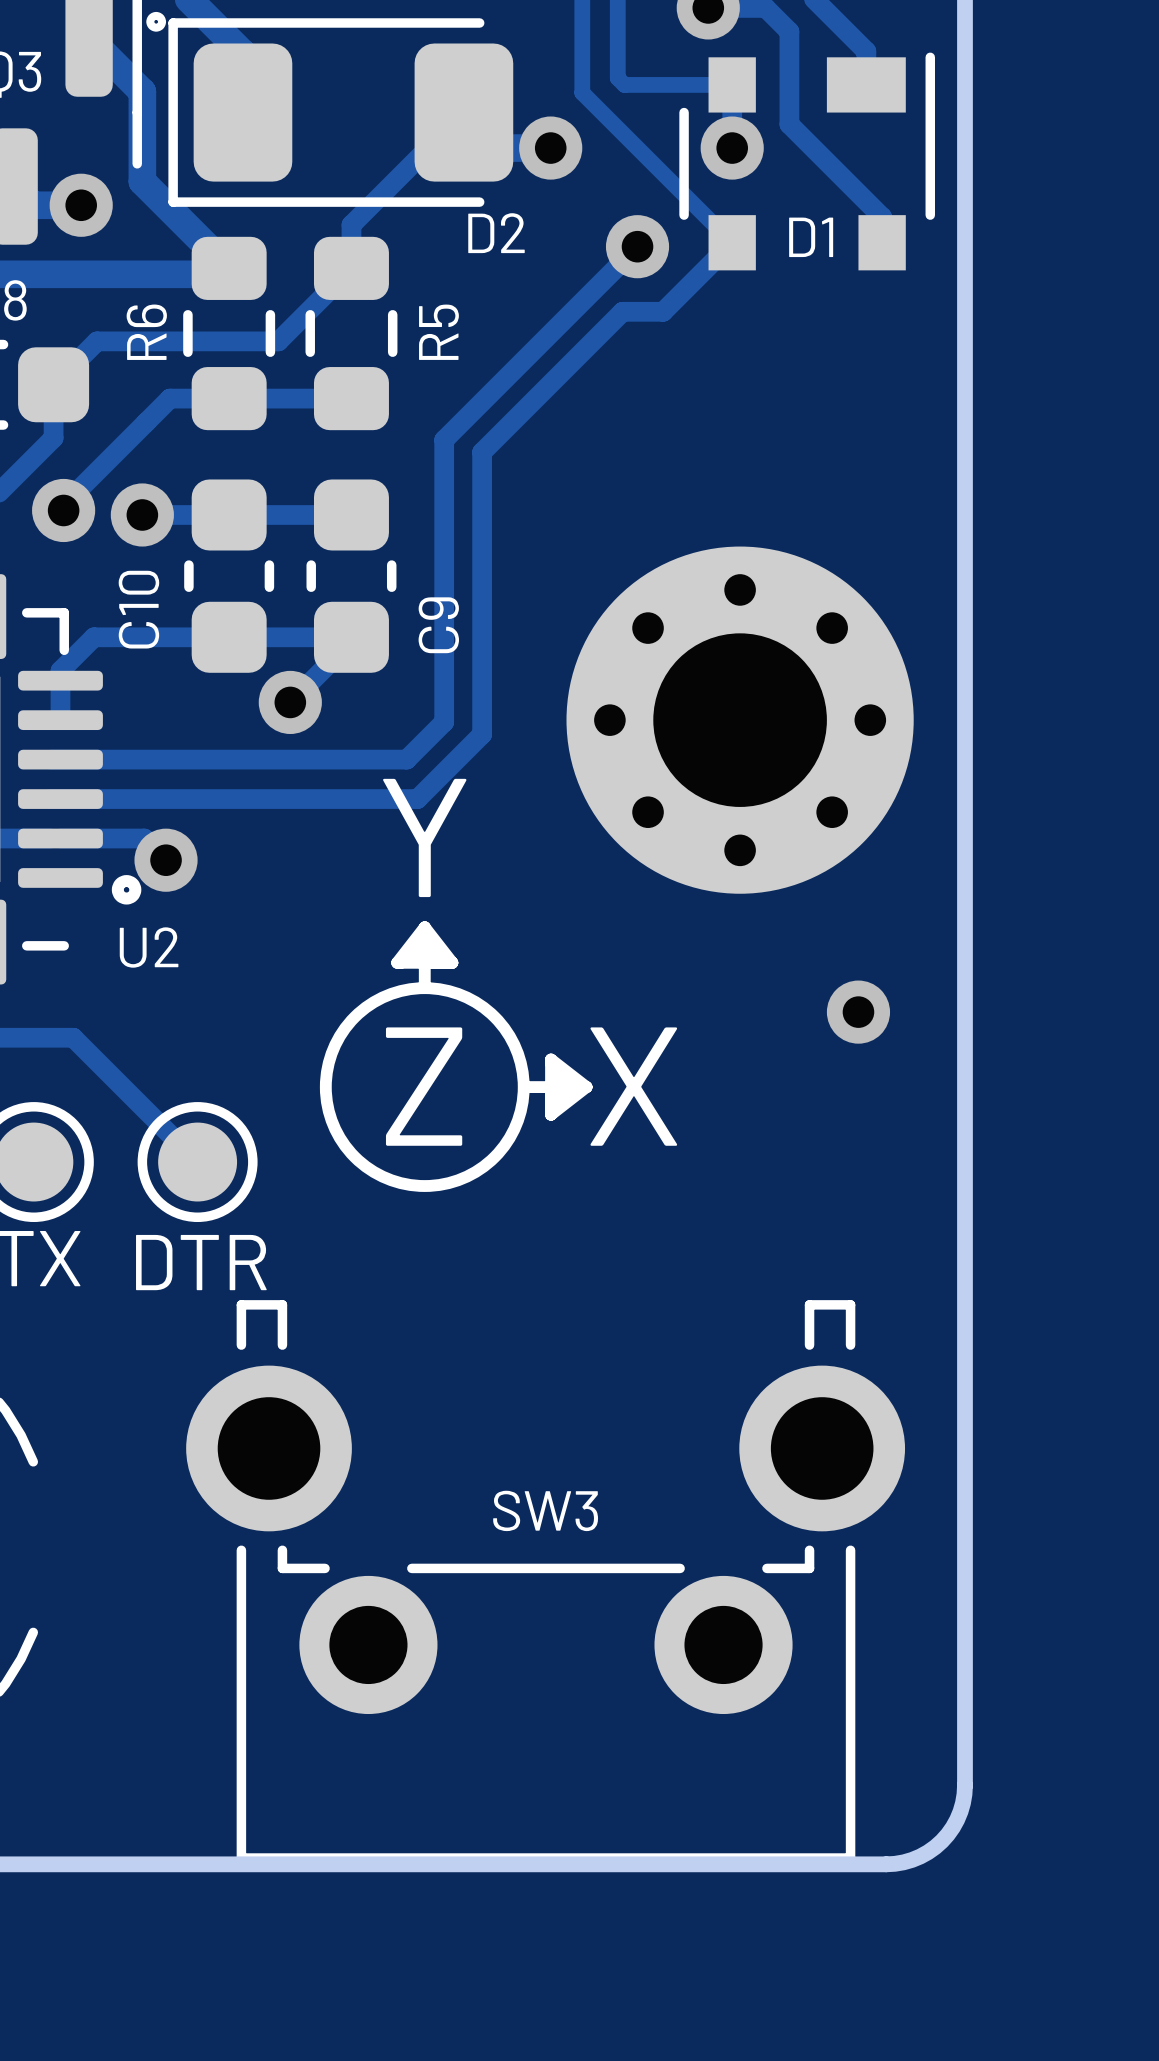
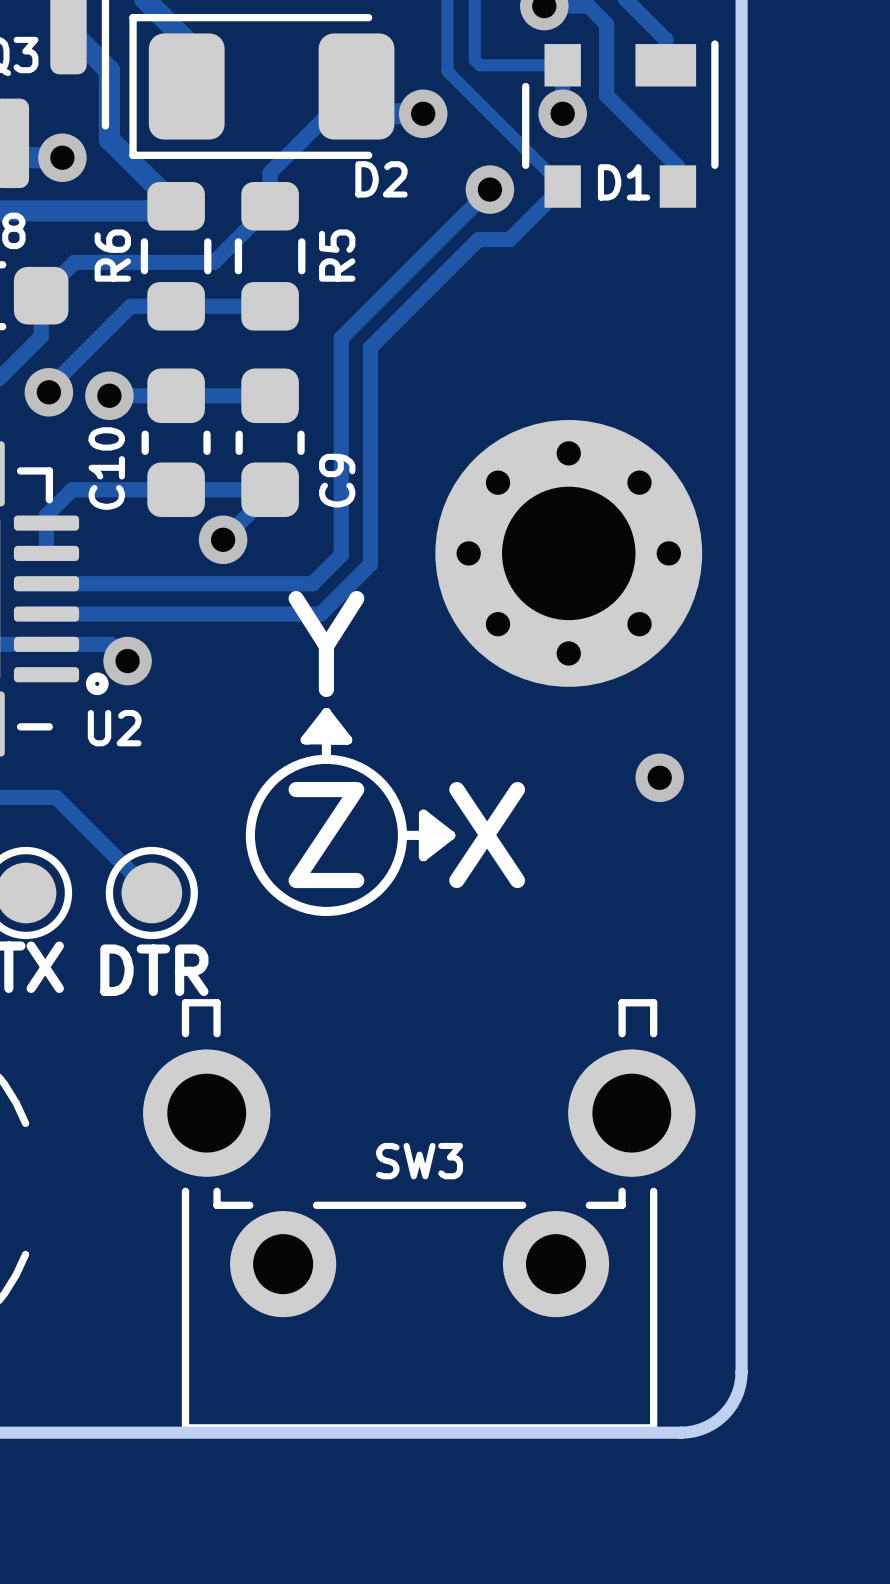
drawing: [146, 11, 167, 32] -> none

